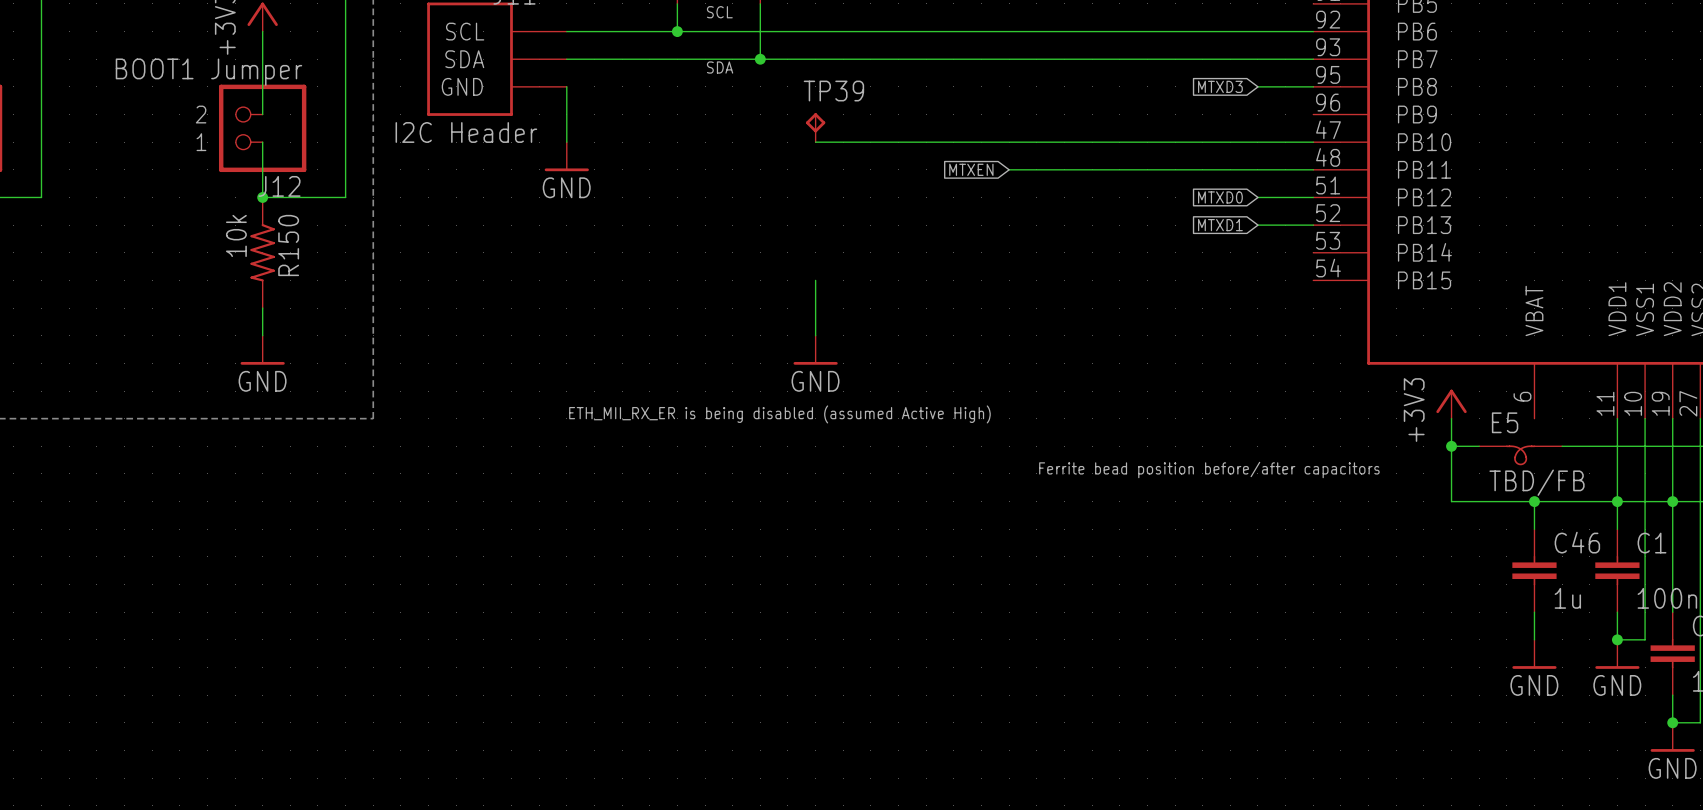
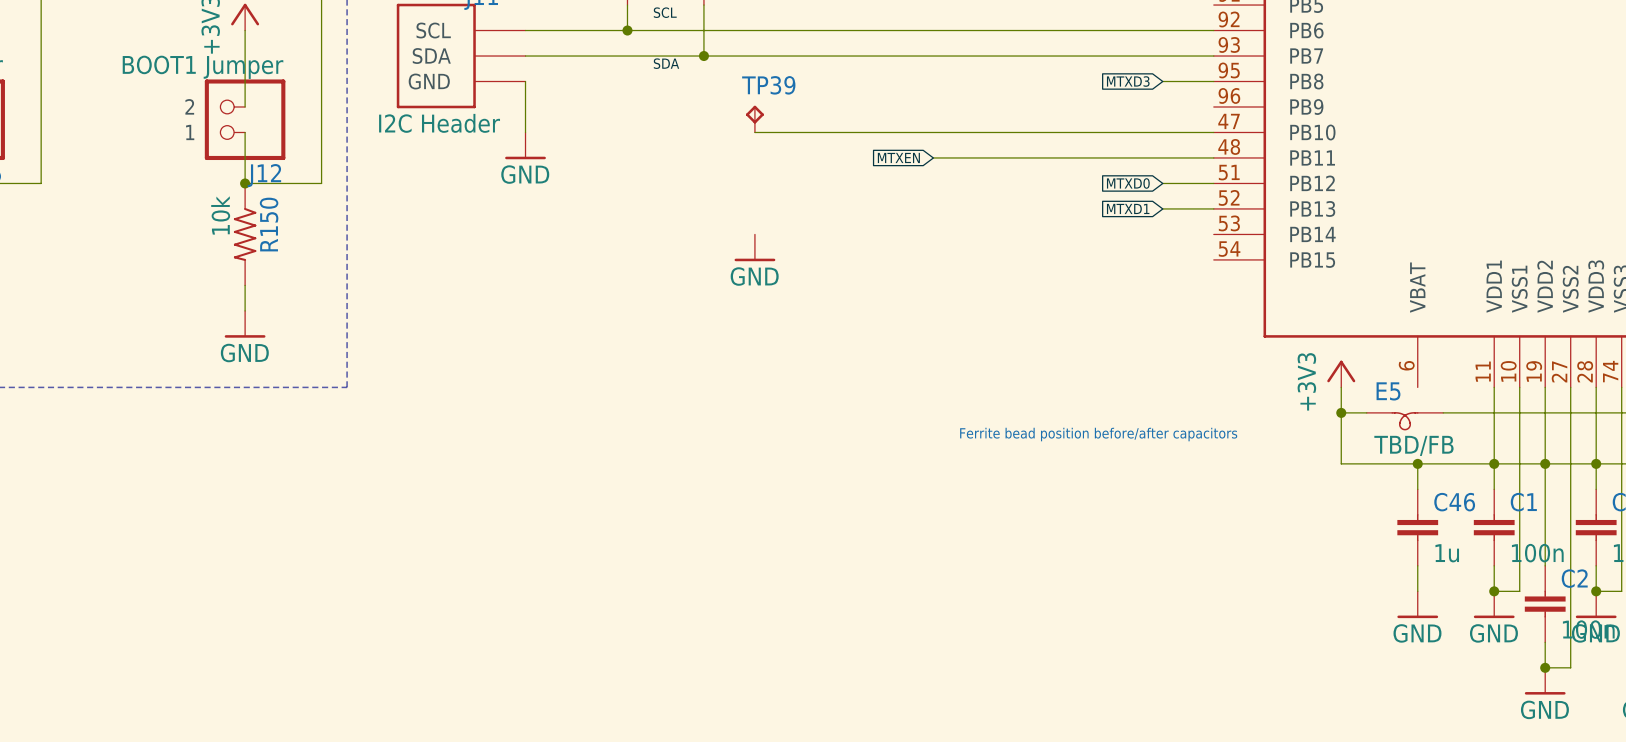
wire: (815, 280) (815, 335) -> none
power symbol position: GND (815, 350) -> GND (754, 247)
text: ETH_MII_RX_ER is being disabled (assumed Active High) (779, 414) -> none

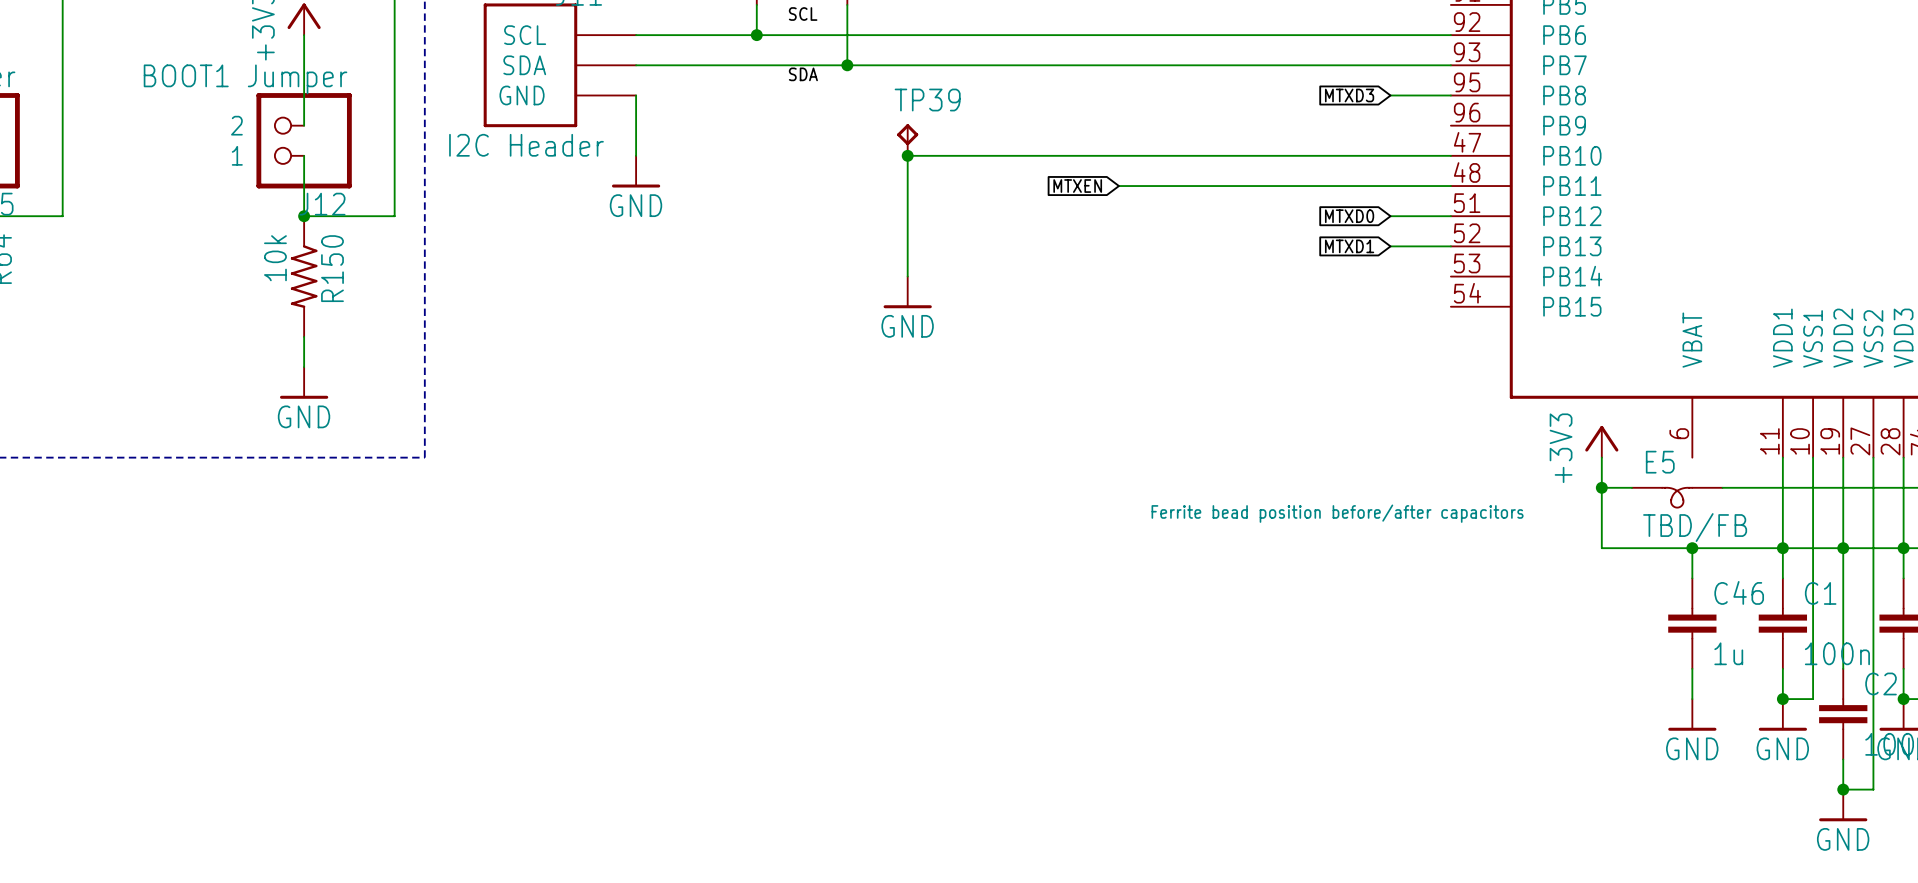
wire: none -> (907, 155) (907, 276)
junction: none -> (907, 155)

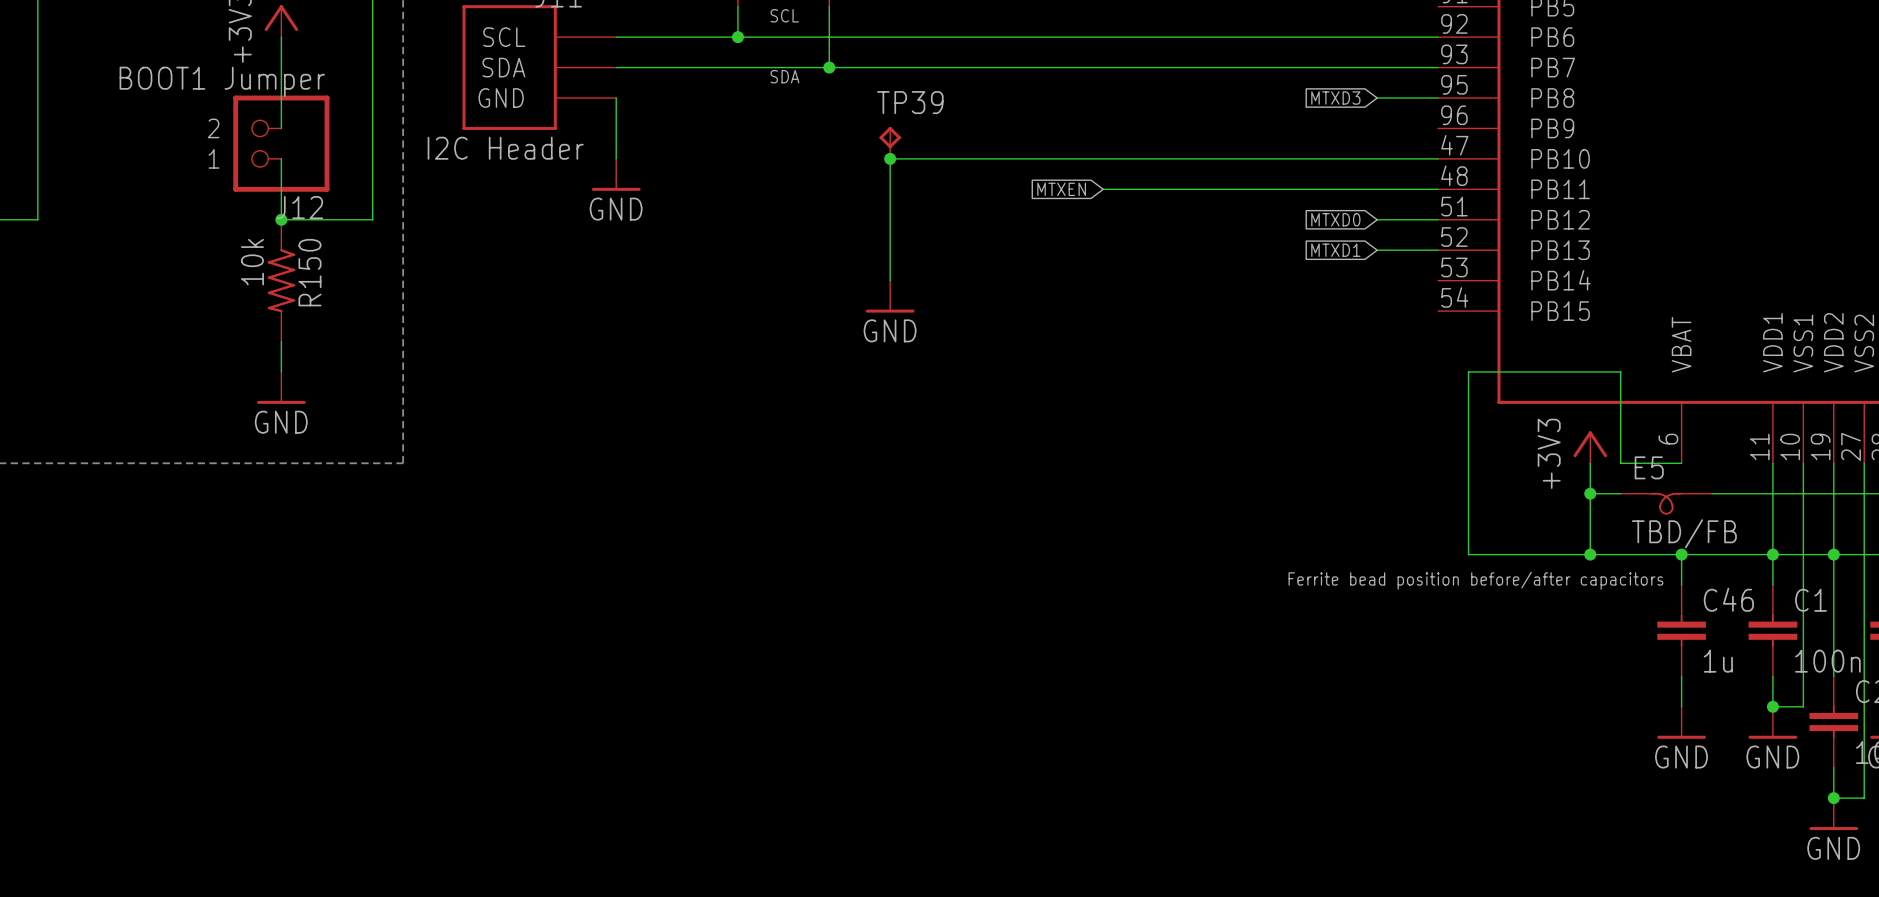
wire: none -> (1681, 463) (1620, 463) (1620, 371) (1468, 371) (1468, 554) (1590, 554)
text position: Ferrite bead position before/after capacitors (1337, 513) -> Ferrite bead position before/after capacitors (1475, 580)
junction: none -> (1590, 554)

